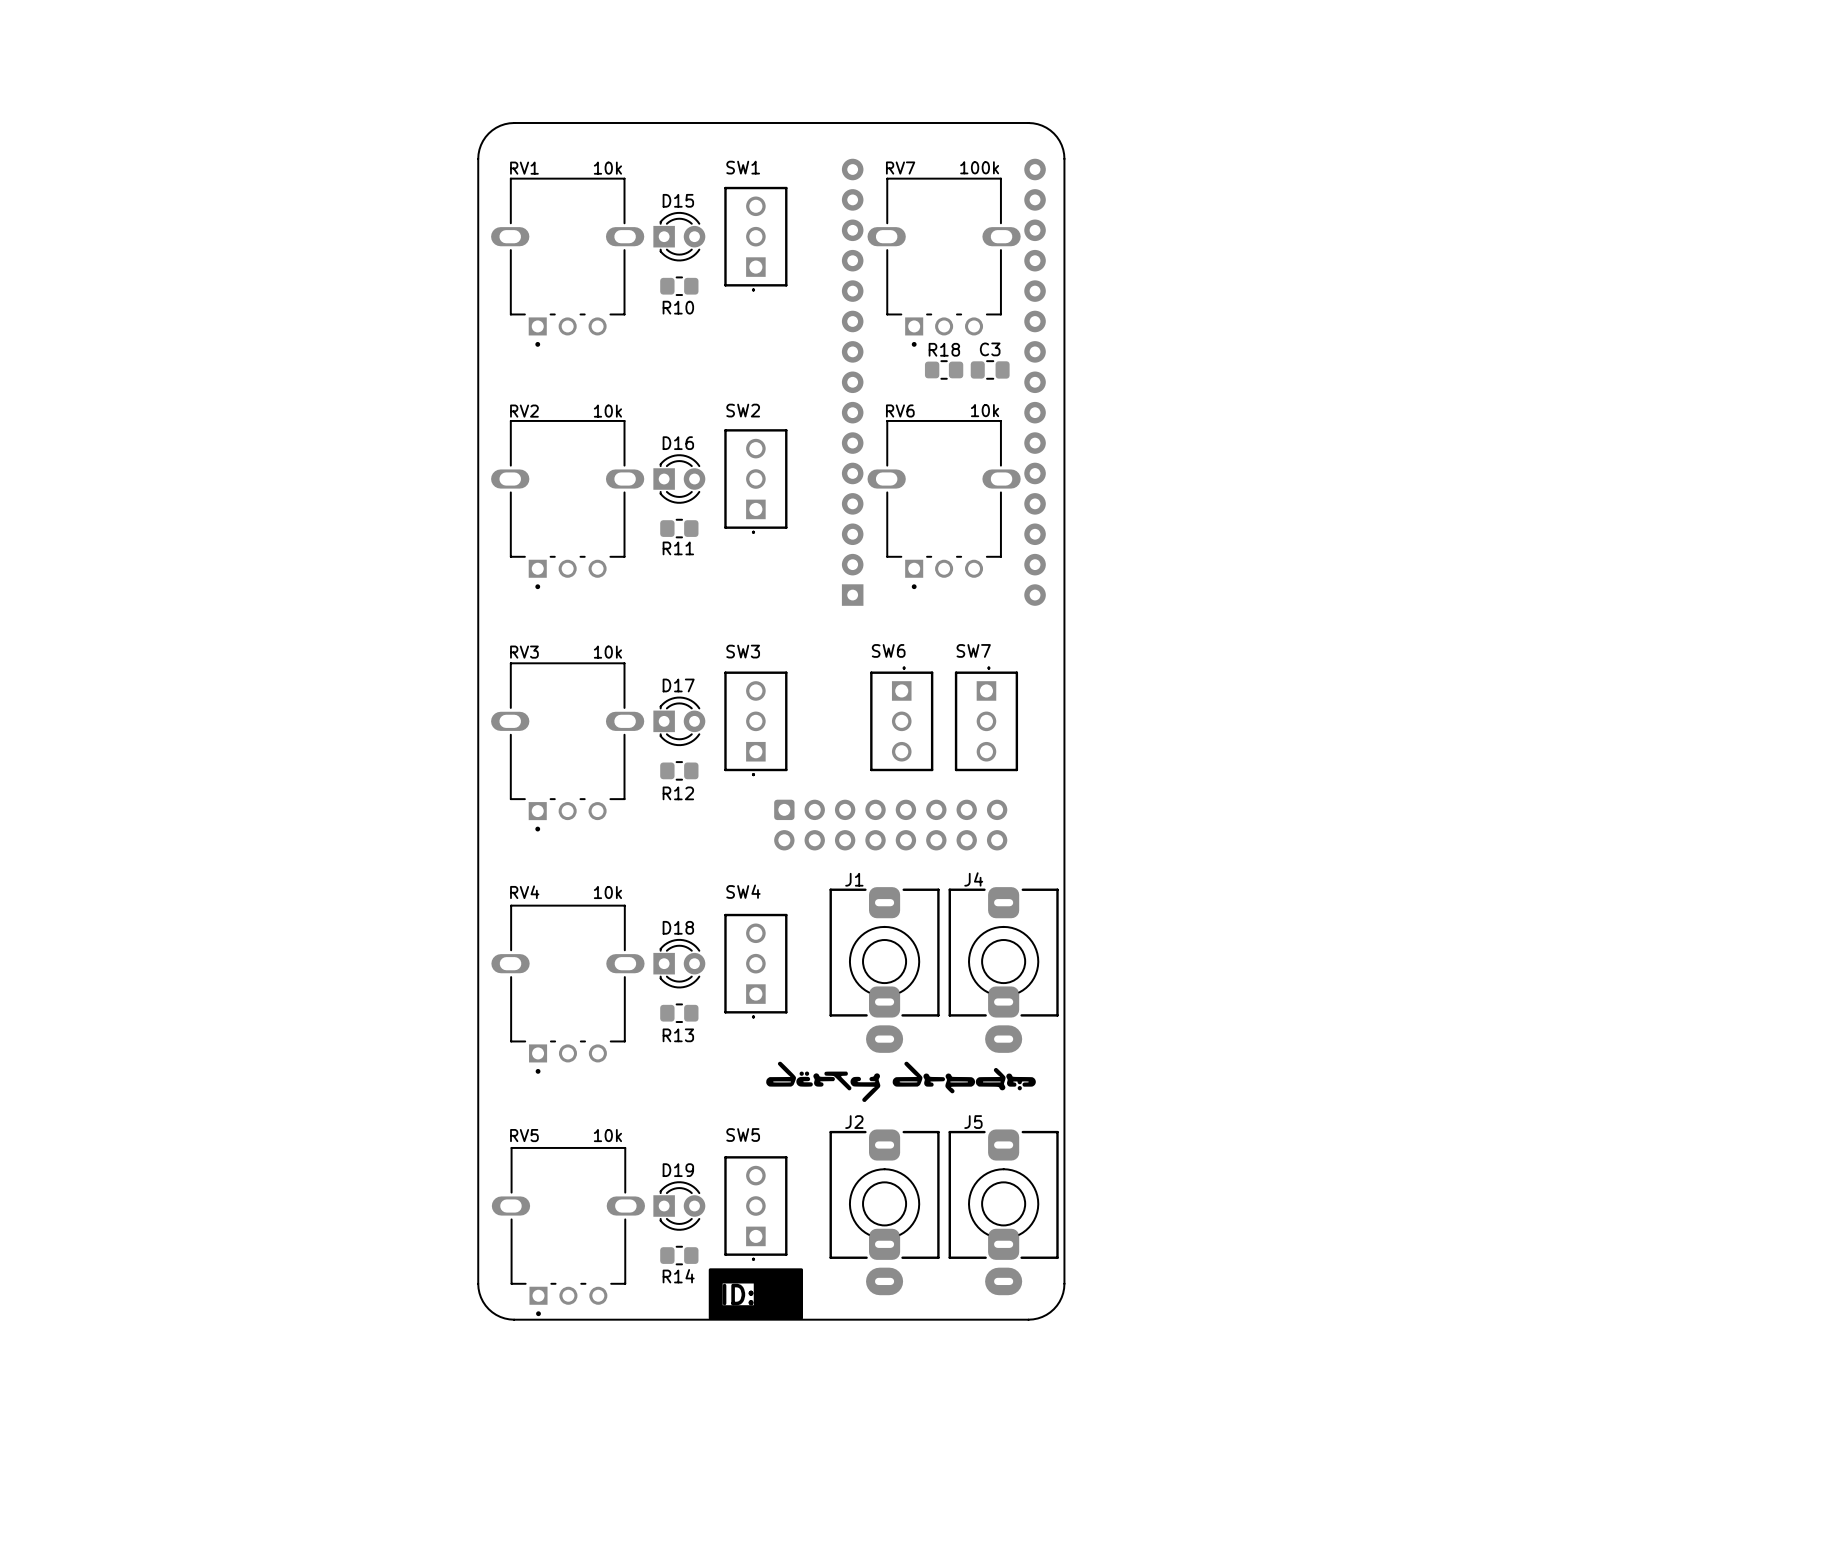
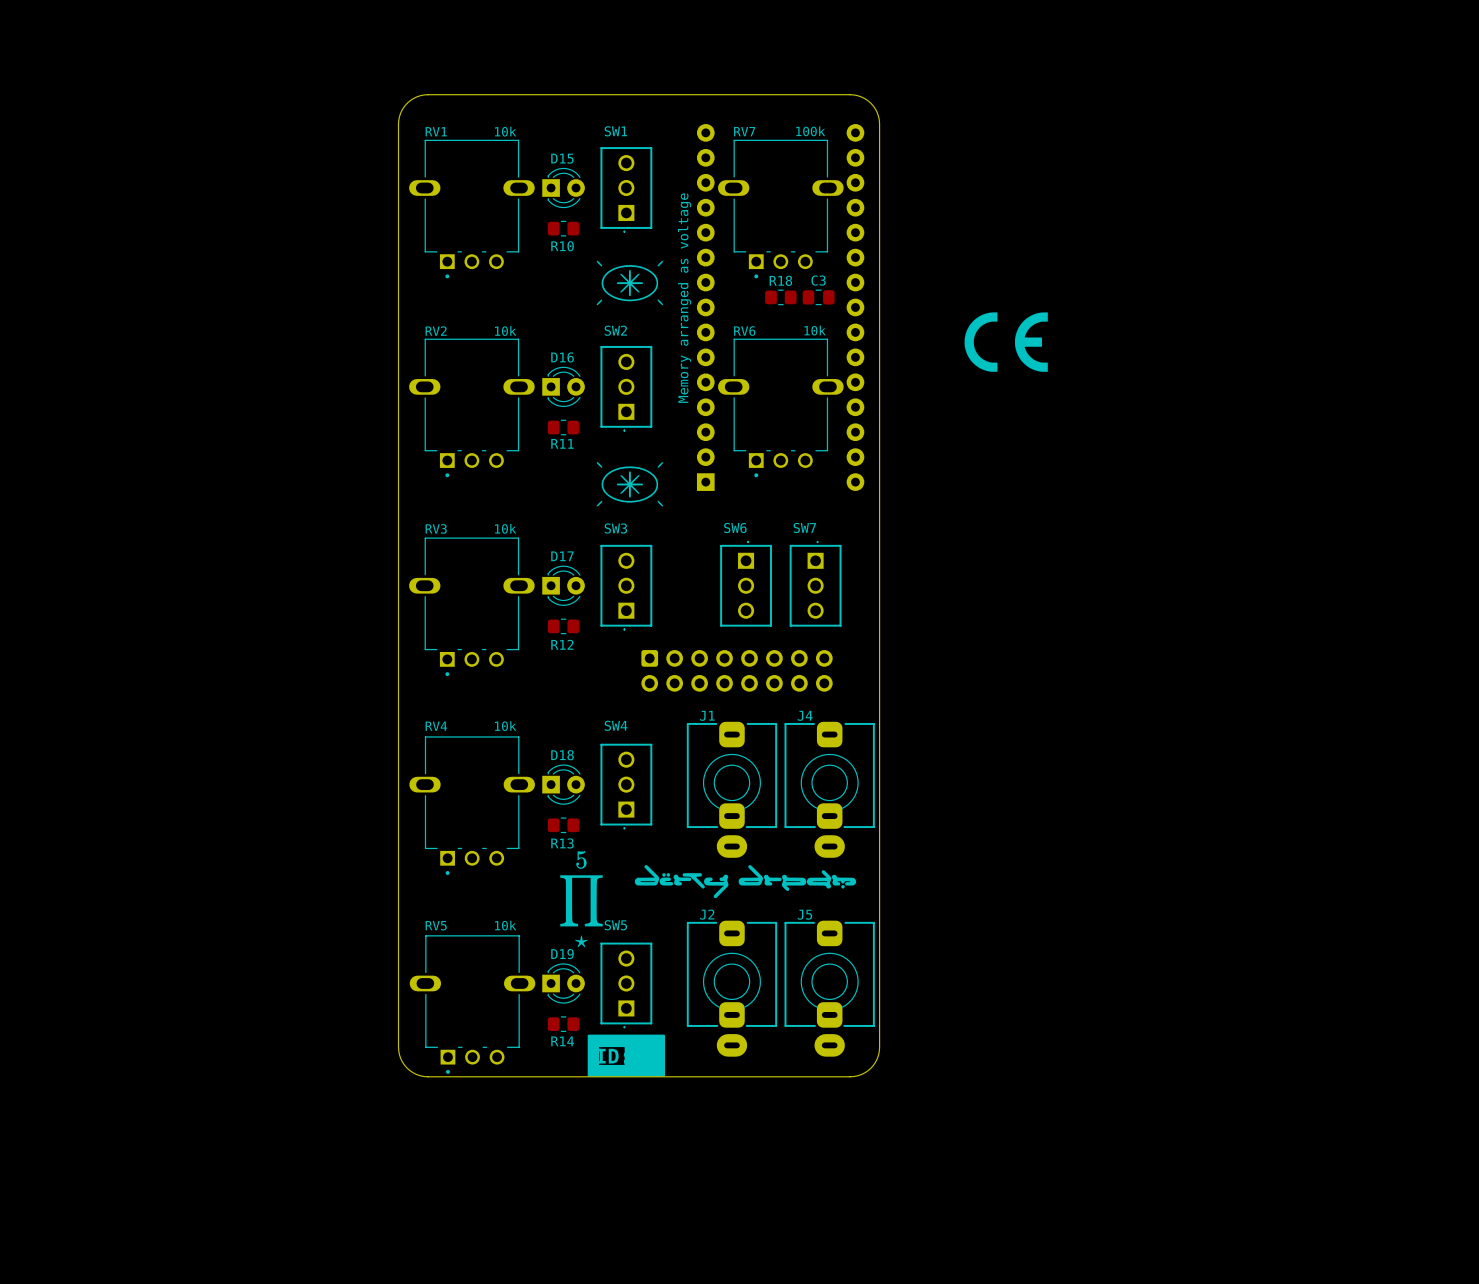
drawing: none -> [596, 260, 664, 306]
text: none -> Memory arranged as voltage (684, 298)
drawing: none -> [964, 312, 1048, 372]
drawing: none -> [596, 462, 664, 507]
drawing: none -> [560, 851, 603, 948]

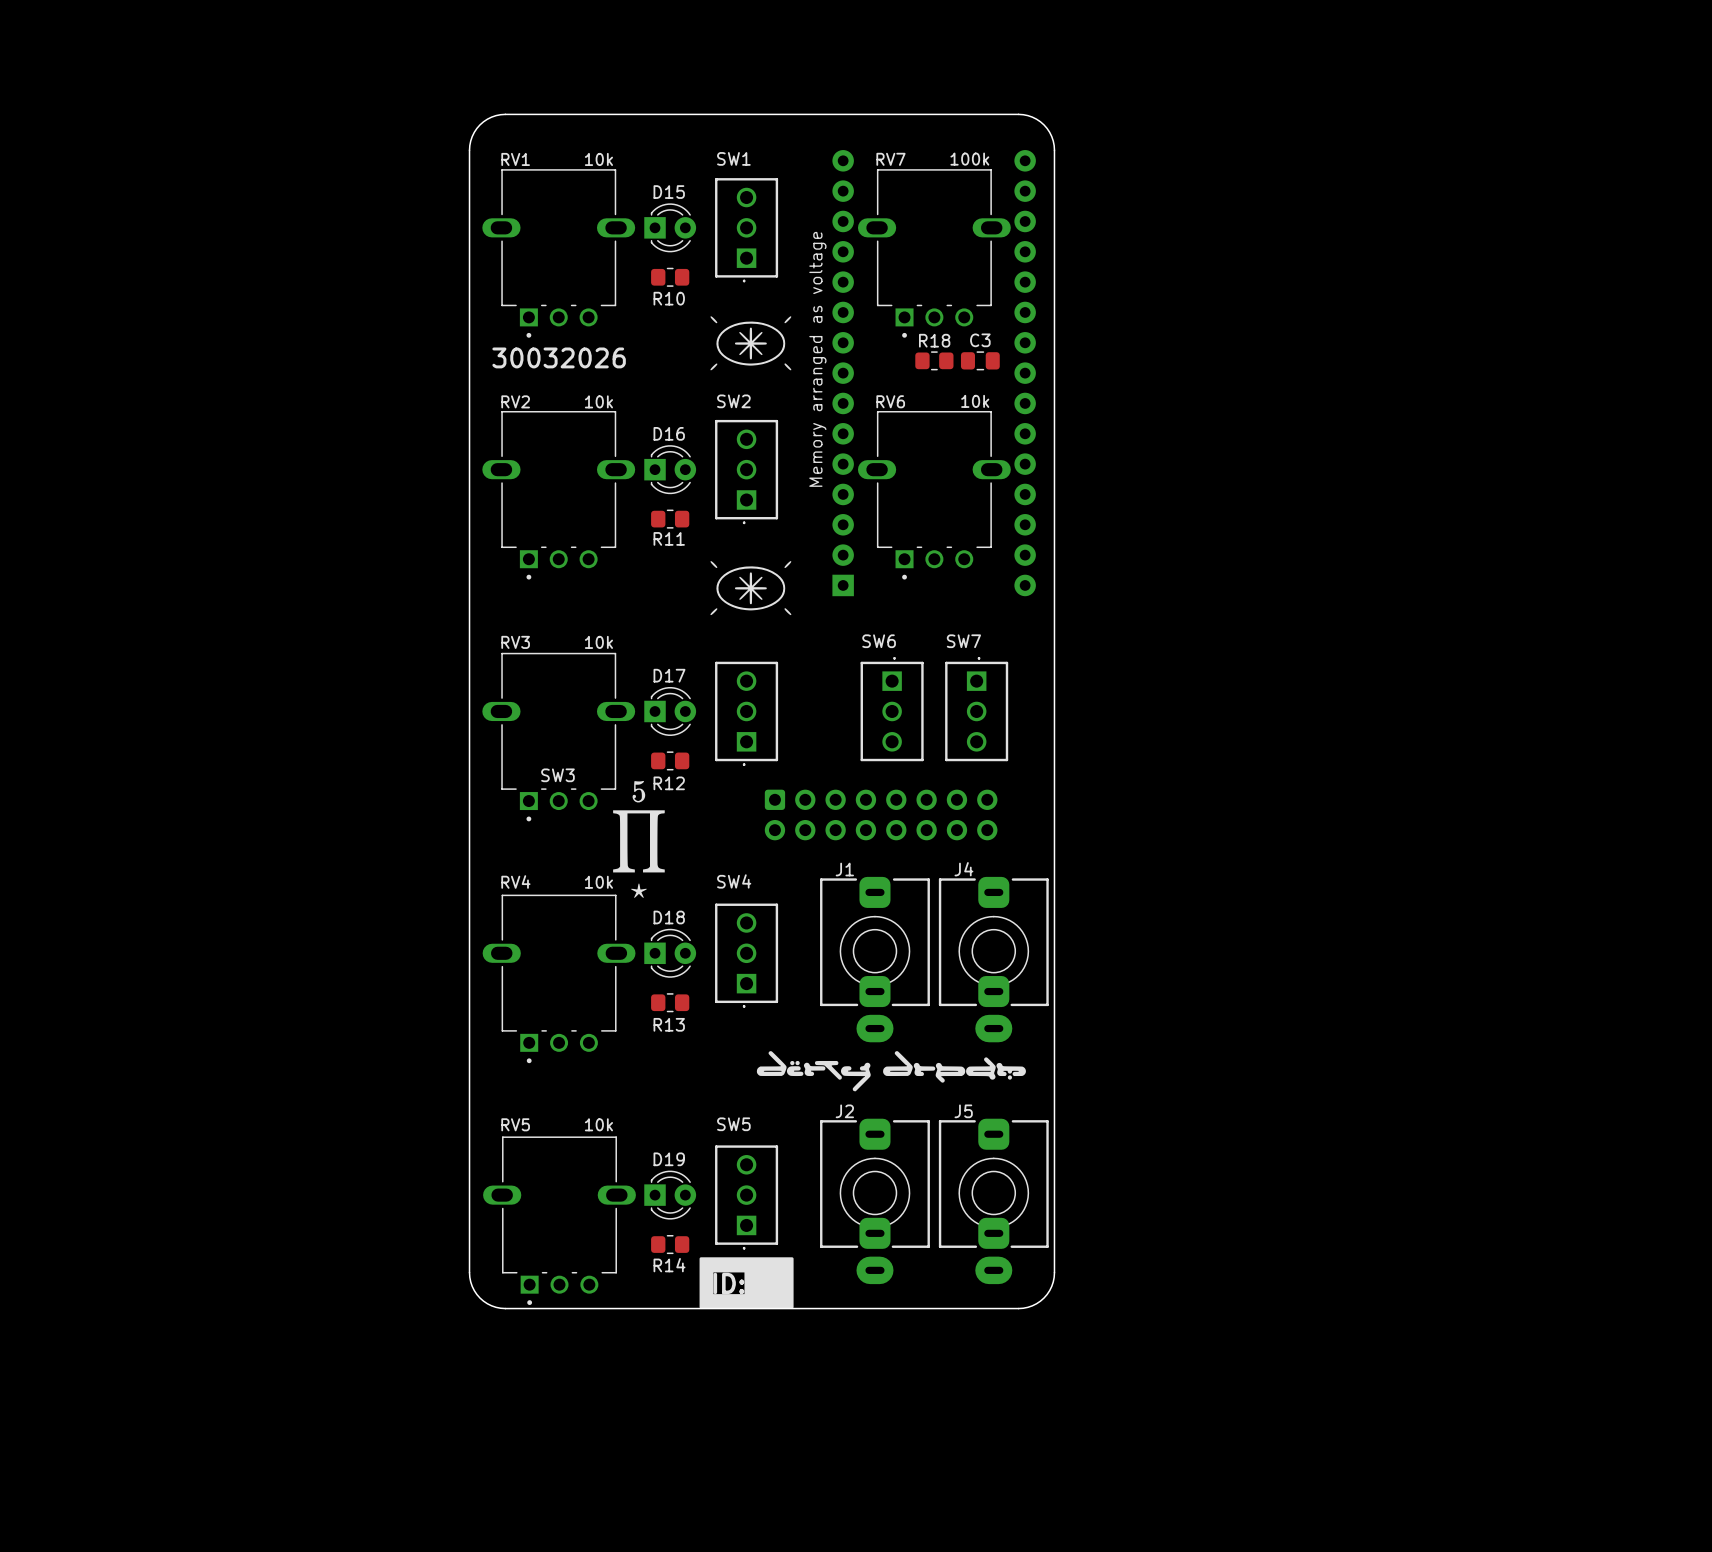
text: none -> 30032026 (559, 357)
drawing: [964, 312, 1048, 372] -> none
SW3 name position: SW3 (615, 528) -> SW3 (557, 775)
drawing position: (581, 899) -> (638, 839)

